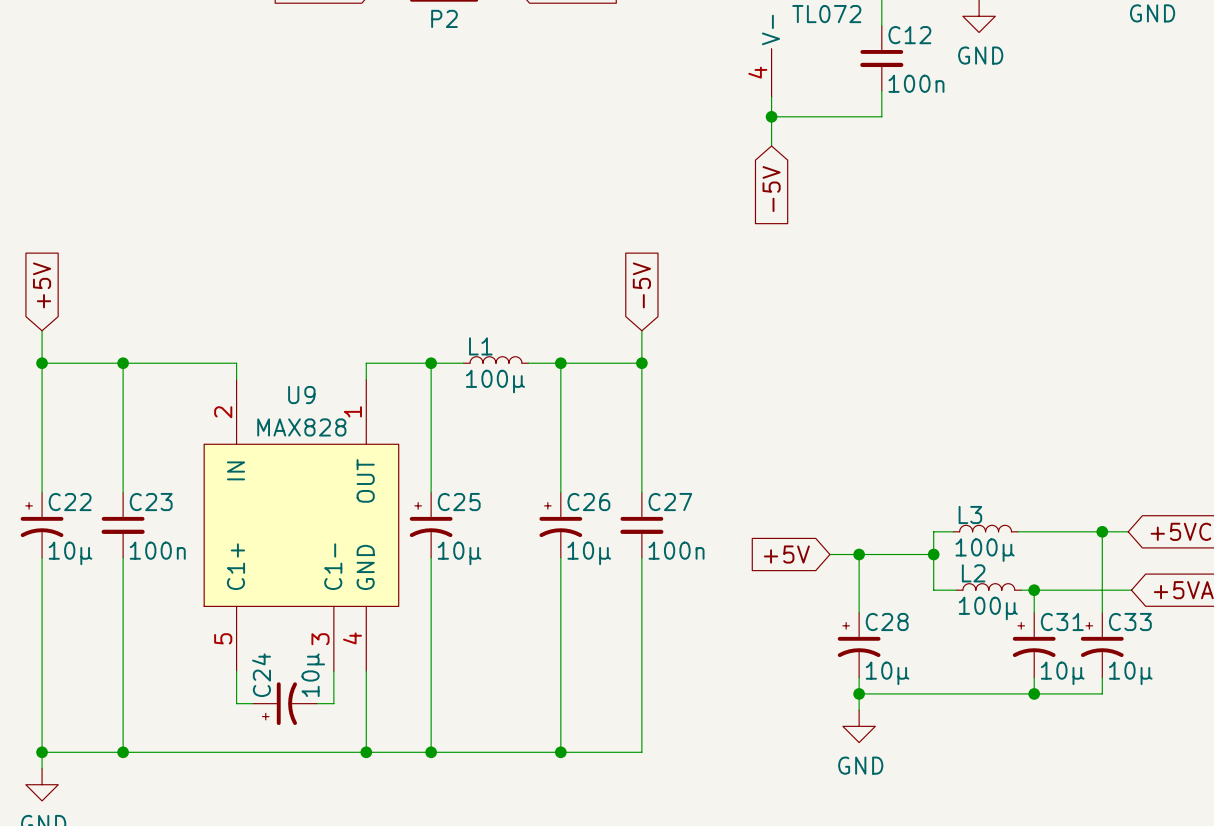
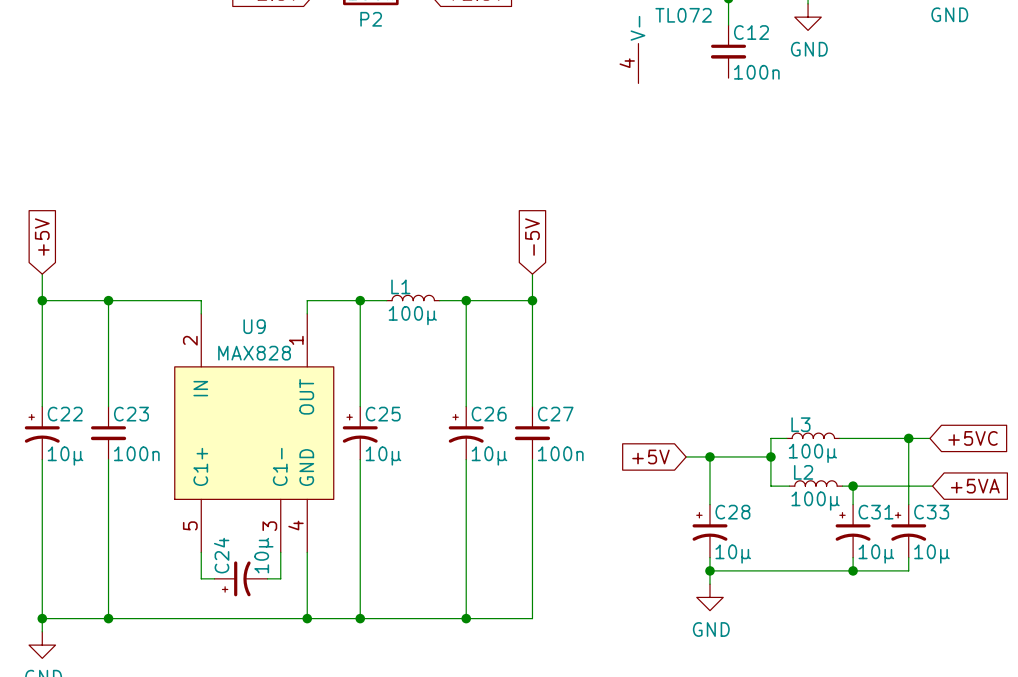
wire: (881, 90) (881, 116) (771, 116) -> none
wire: (771, 97) (771, 145) -> none
junction: (771, 116) -> none
global label: -5V (771, 189) -> none

